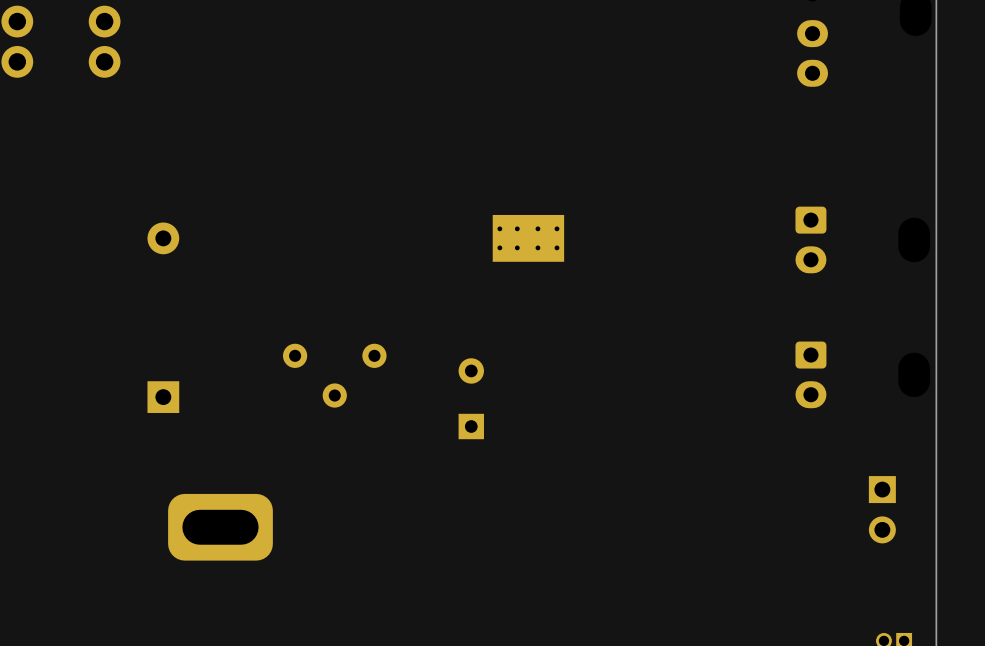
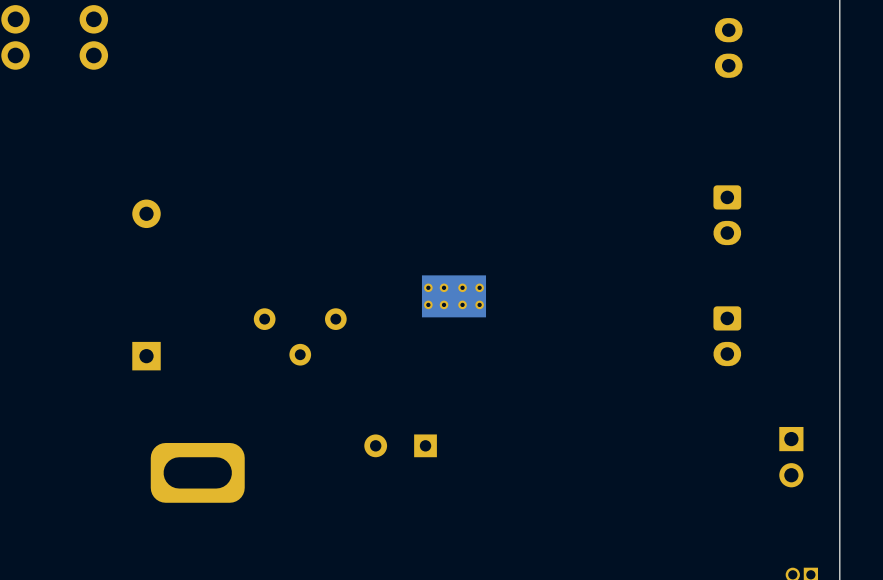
part position: (528, 238) -> (453, 296)
part rotation: 0° (471, 398) -> 90° counterclockwise (400, 445)
part position: (471, 398) -> (400, 445)

